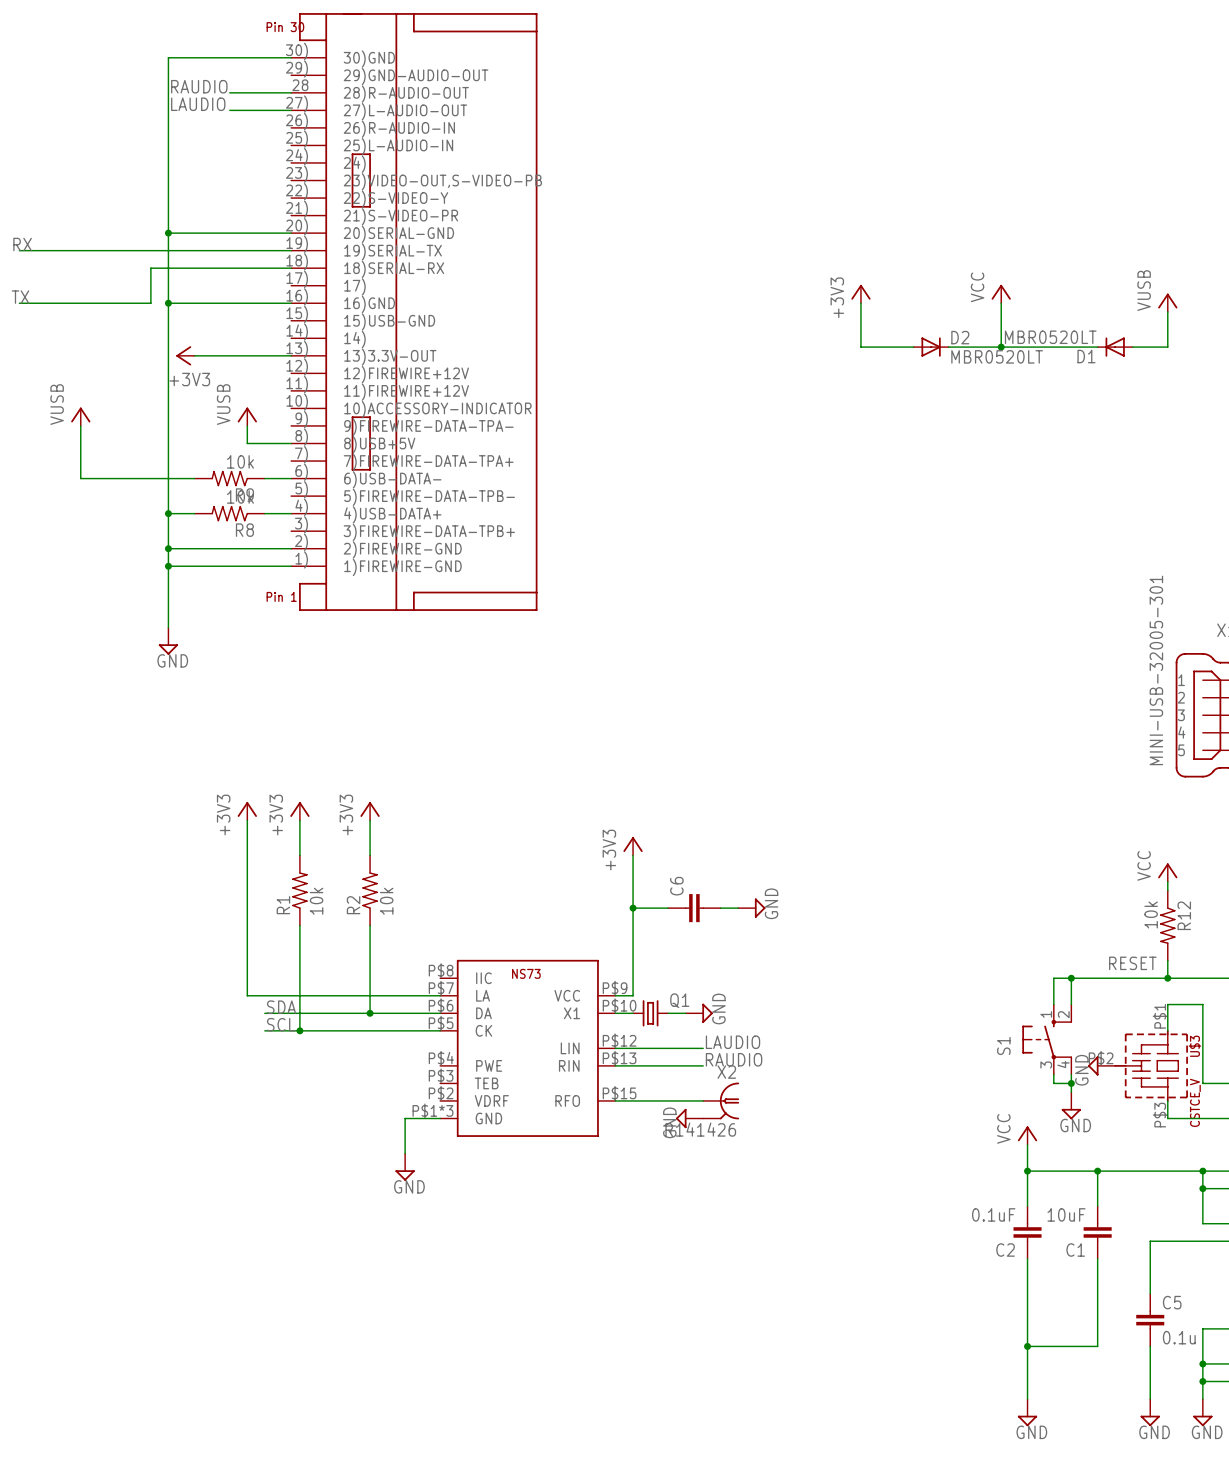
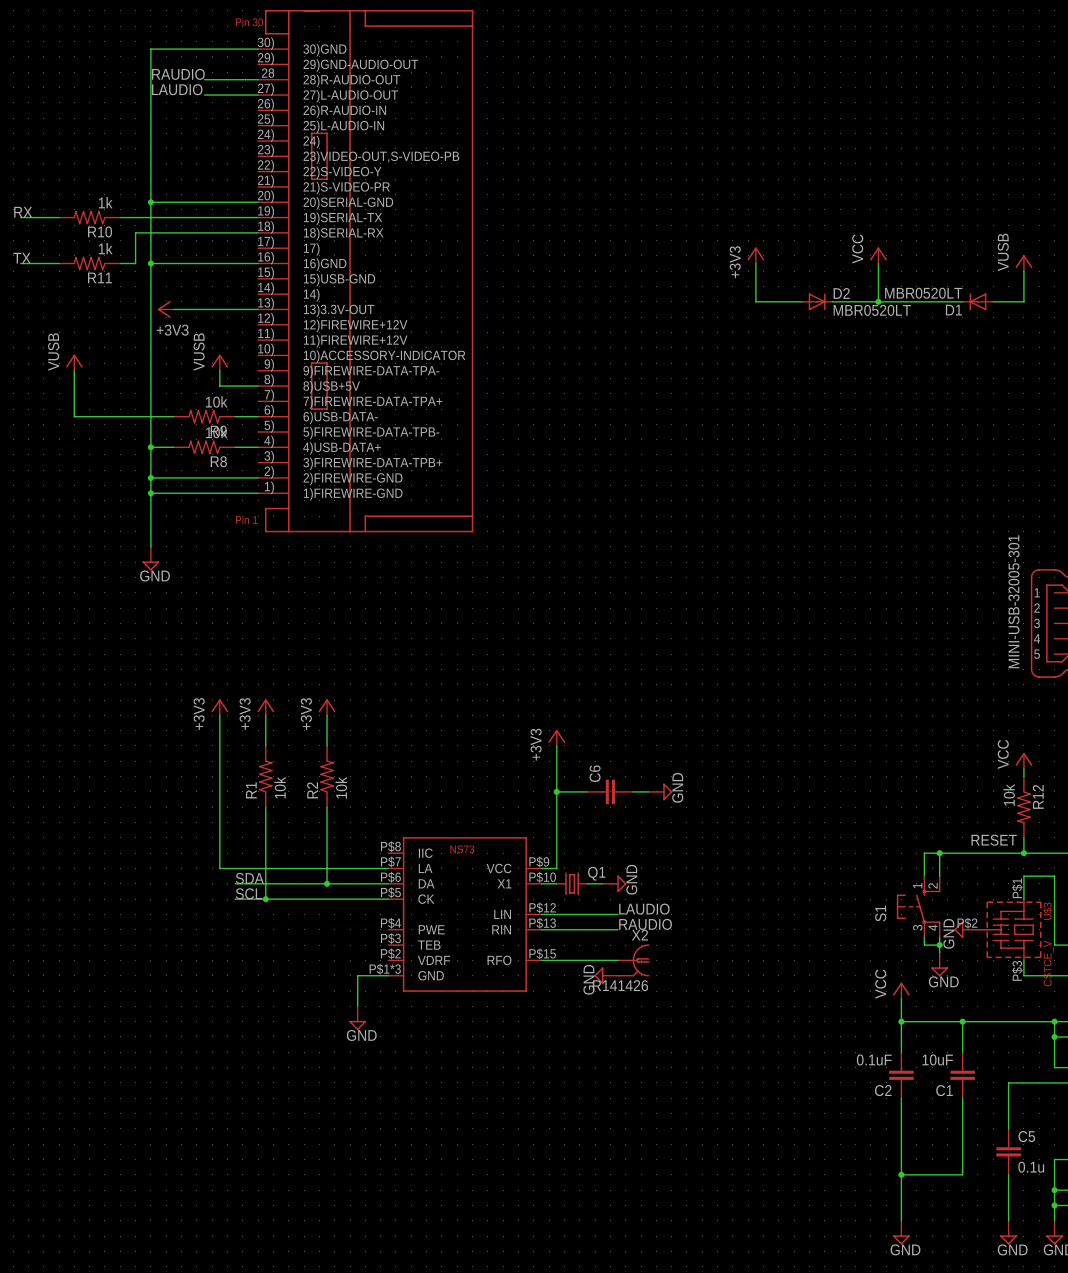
R10: none -> 1k (89, 217)
R11: none -> 1k (89, 263)

